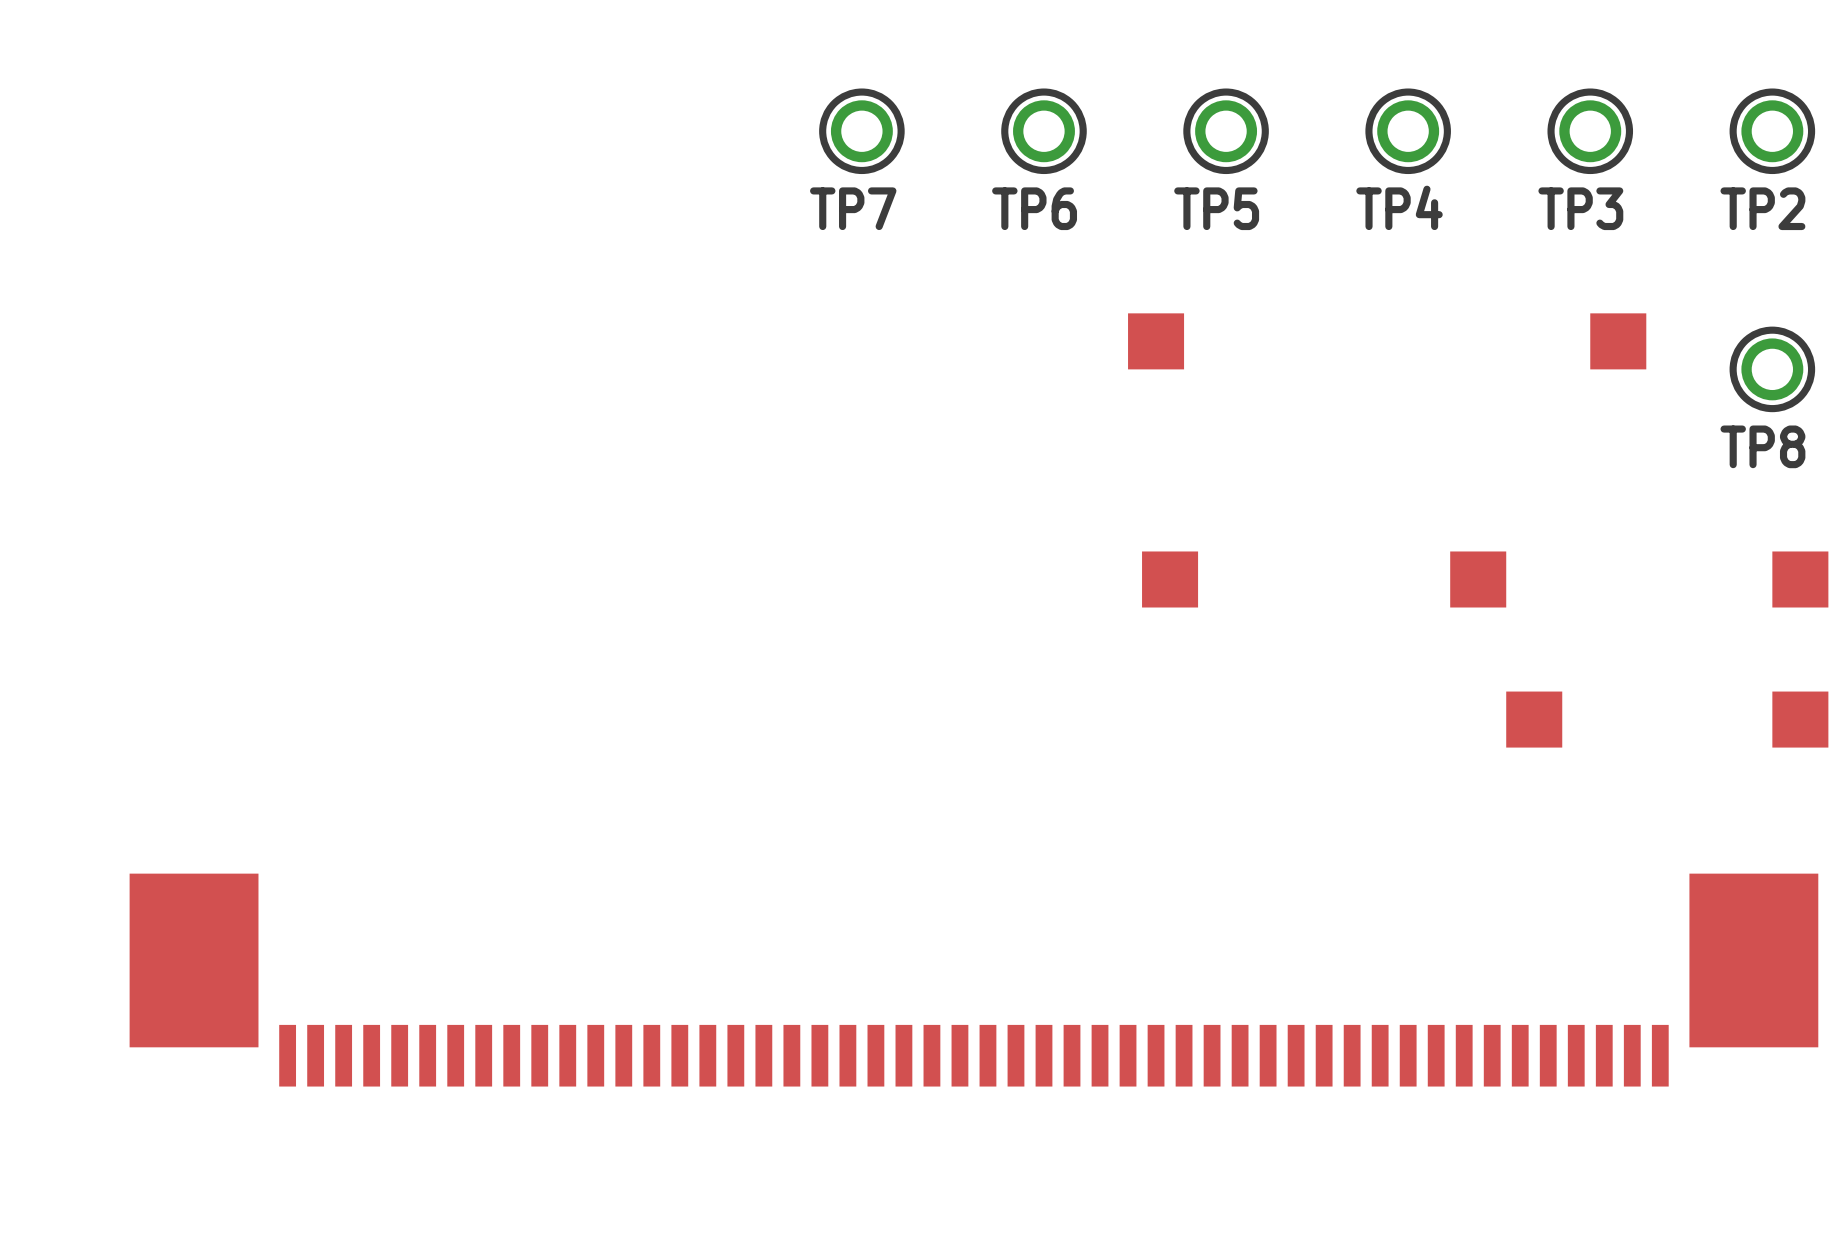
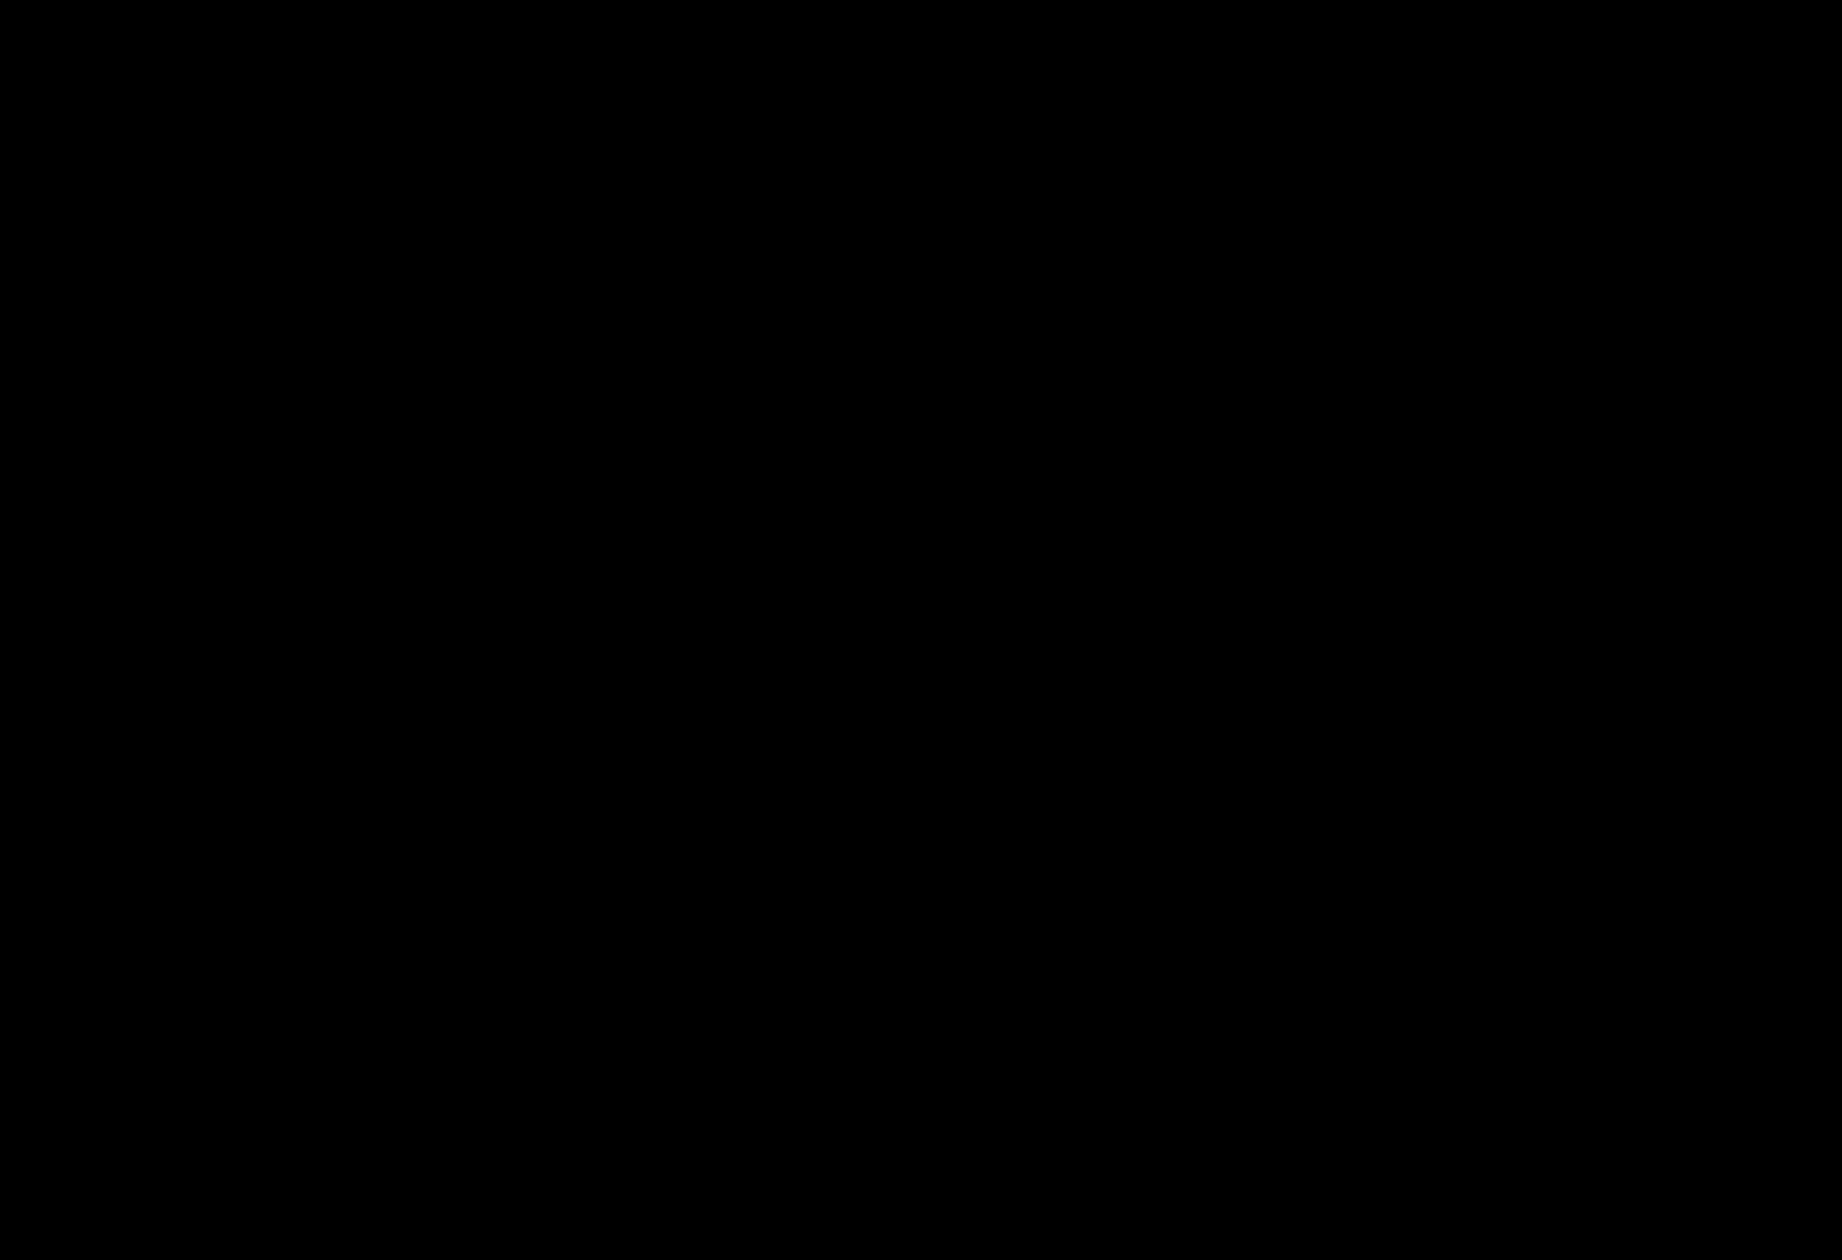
TP7: (861, 131) -> none
TP6: (1043, 131) -> none
TP5: (1226, 131) -> none
TP4: (1408, 131) -> none
TP3: (1590, 131) -> none
TP2: (1772, 131) -> none
part: (1156, 341) -> none
part: (1618, 341) -> none
TP8: (1772, 369) -> none
part: (1170, 579) -> none
part: (1478, 579) -> none
part: (1800, 579) -> none
part: (1534, 719) -> none
part: (1800, 719) -> none
part: (973, 980) -> none

